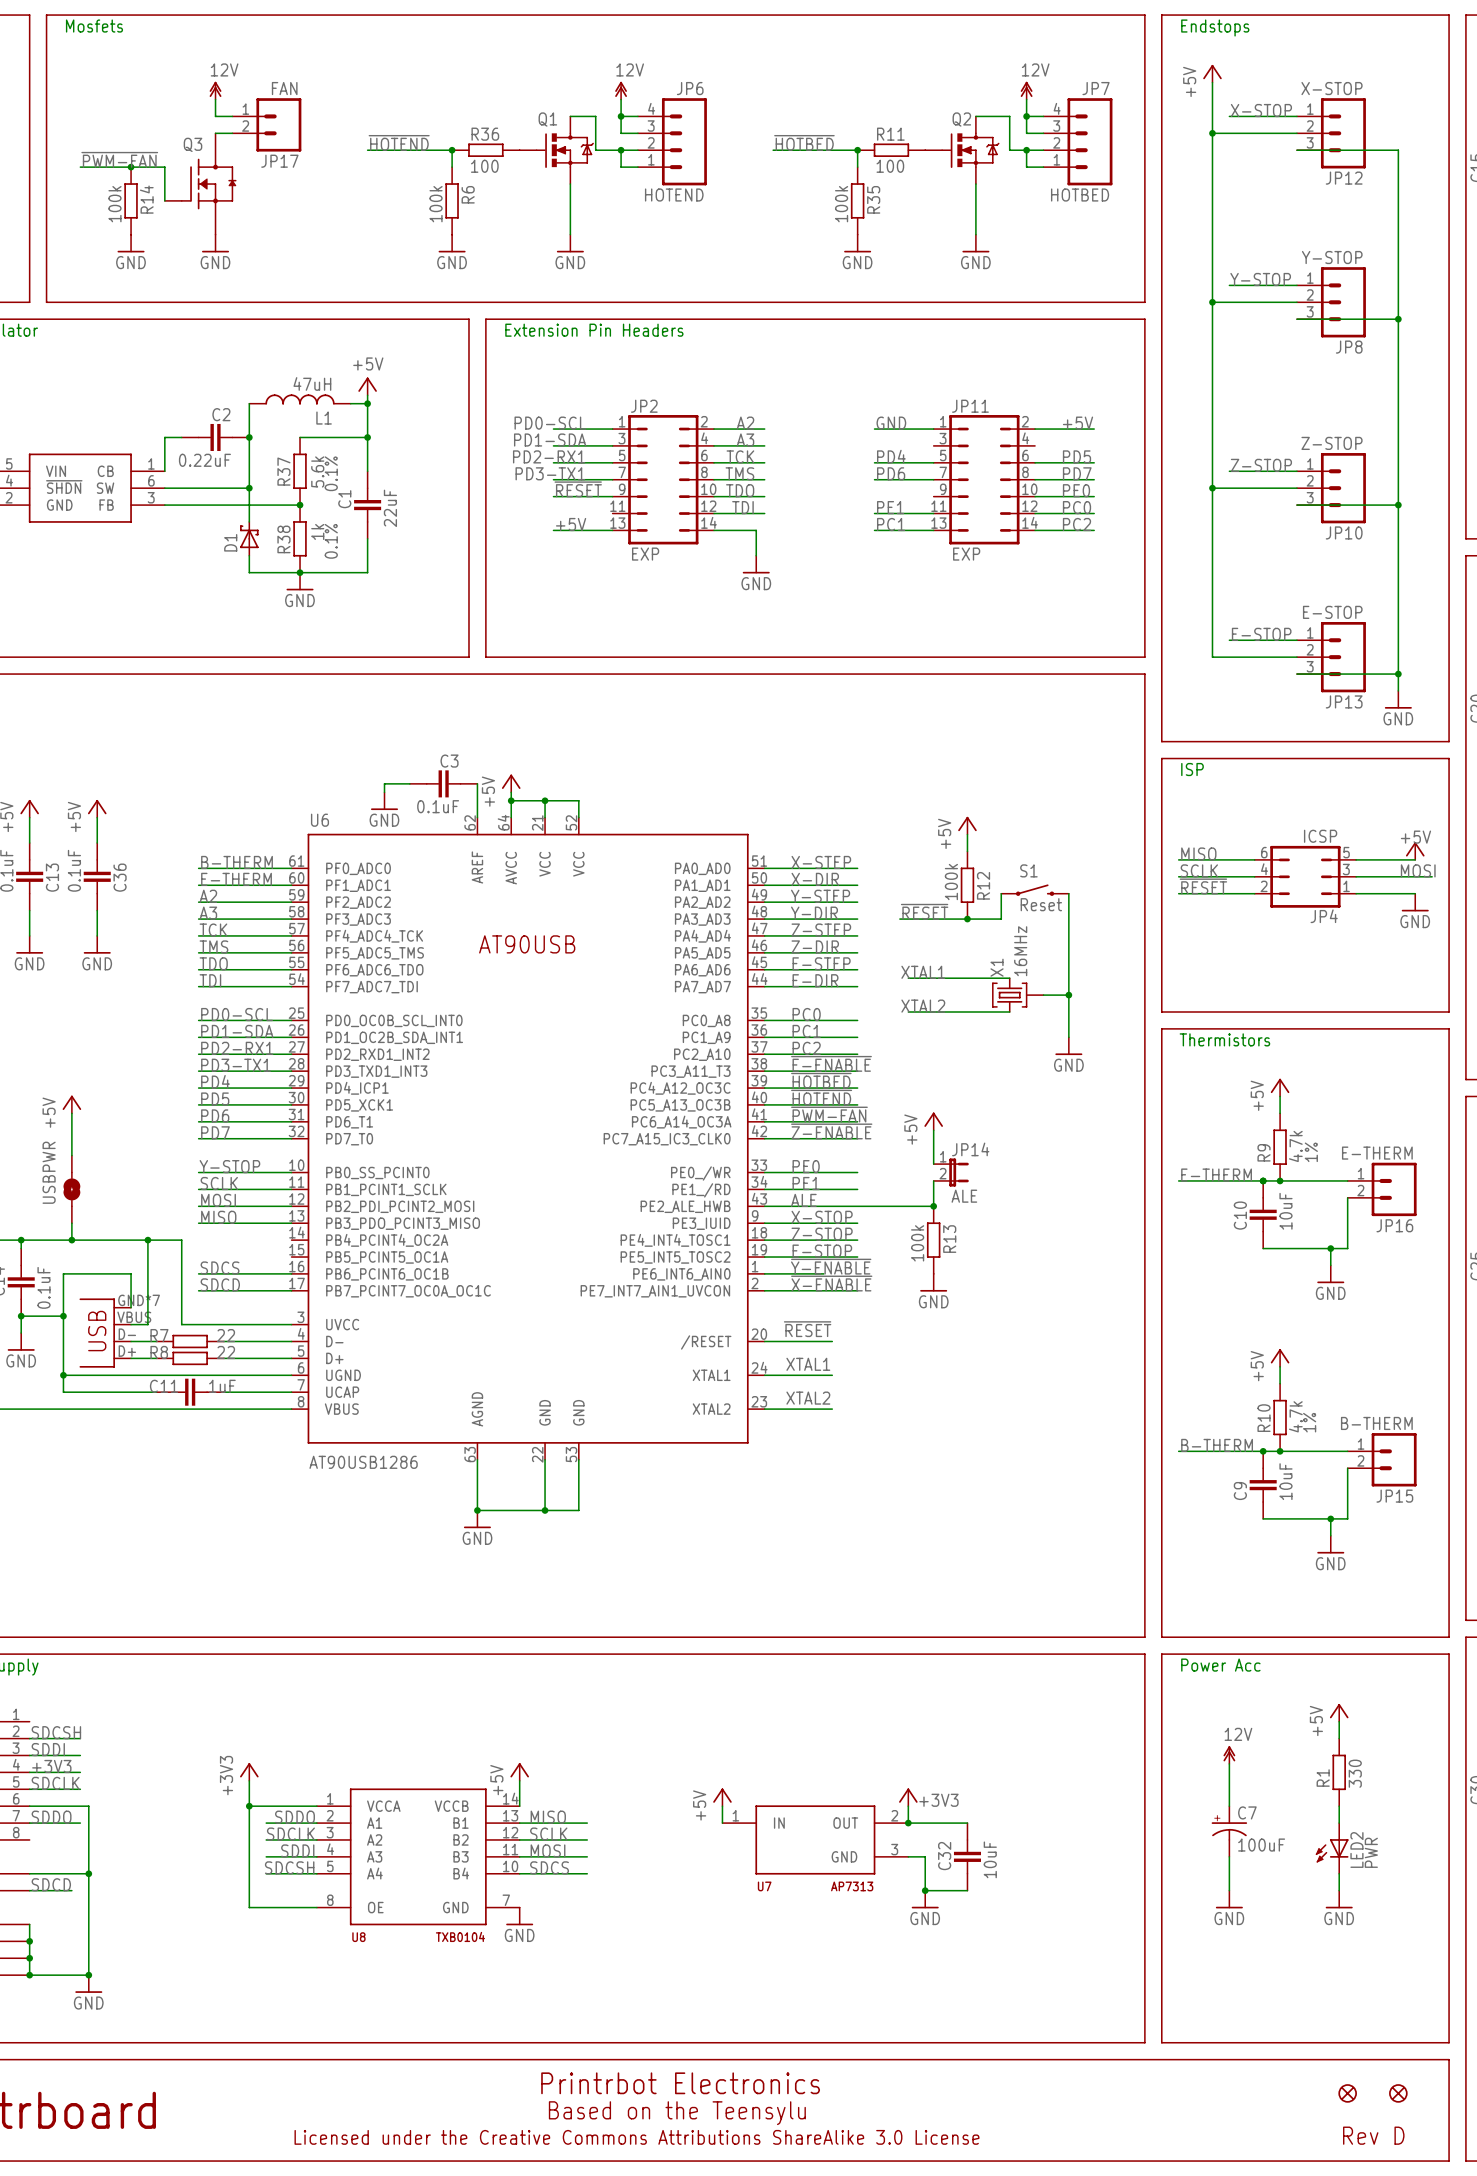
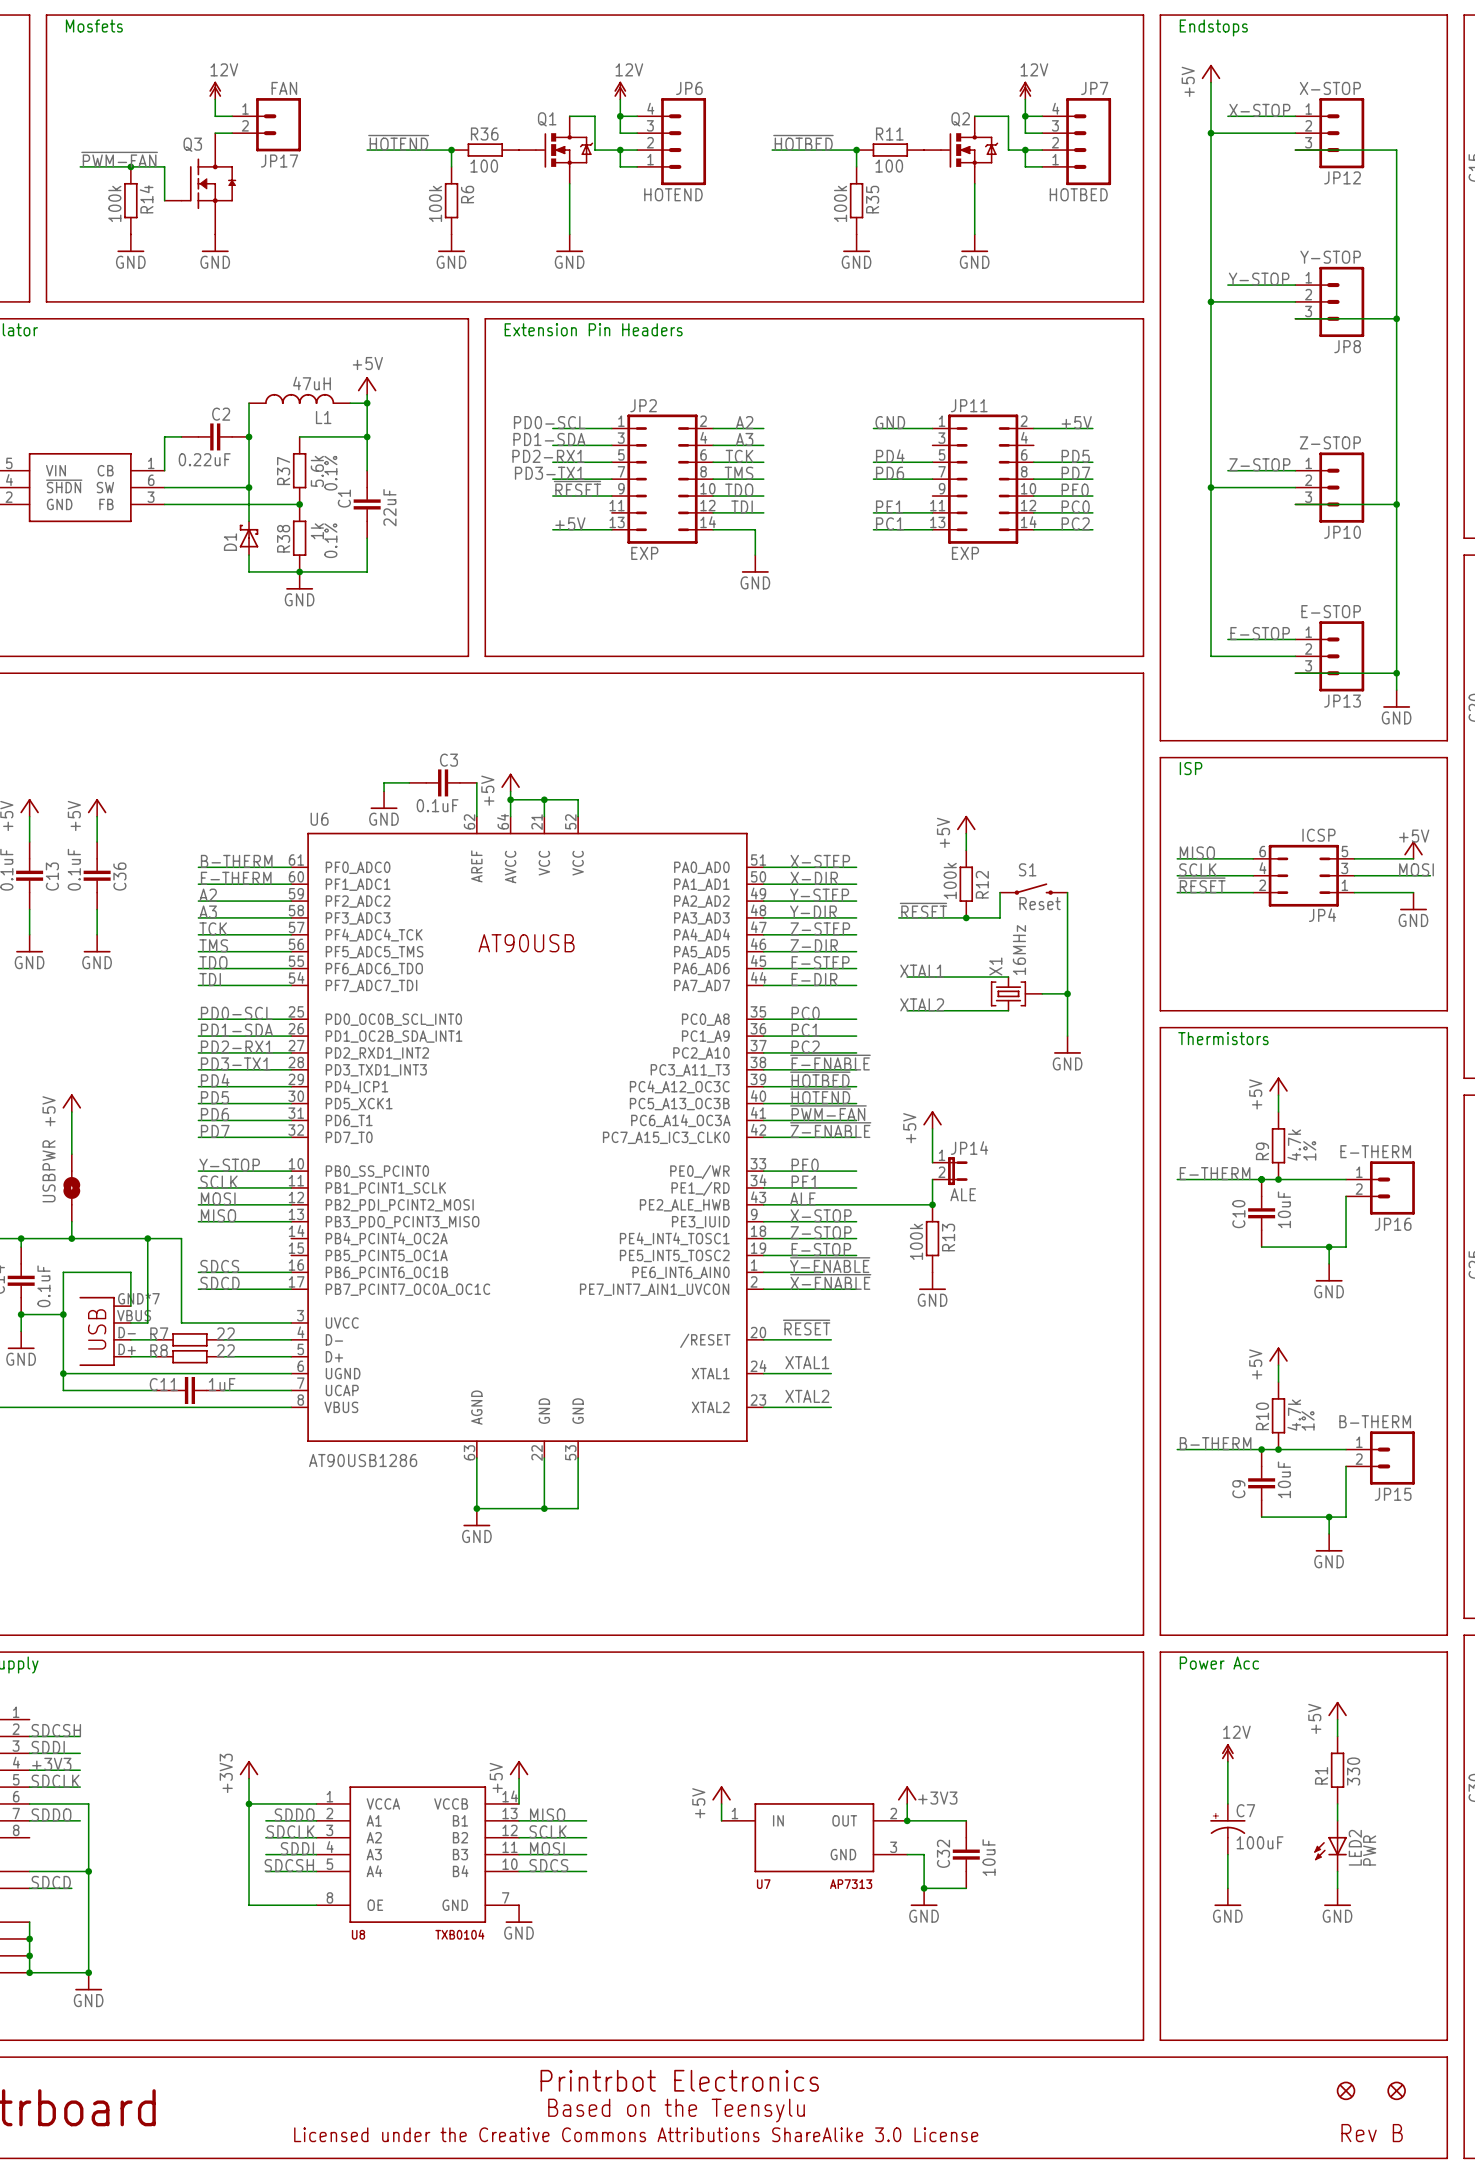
text: Rev D (1373, 2135) -> Rev B (1372, 2133)

